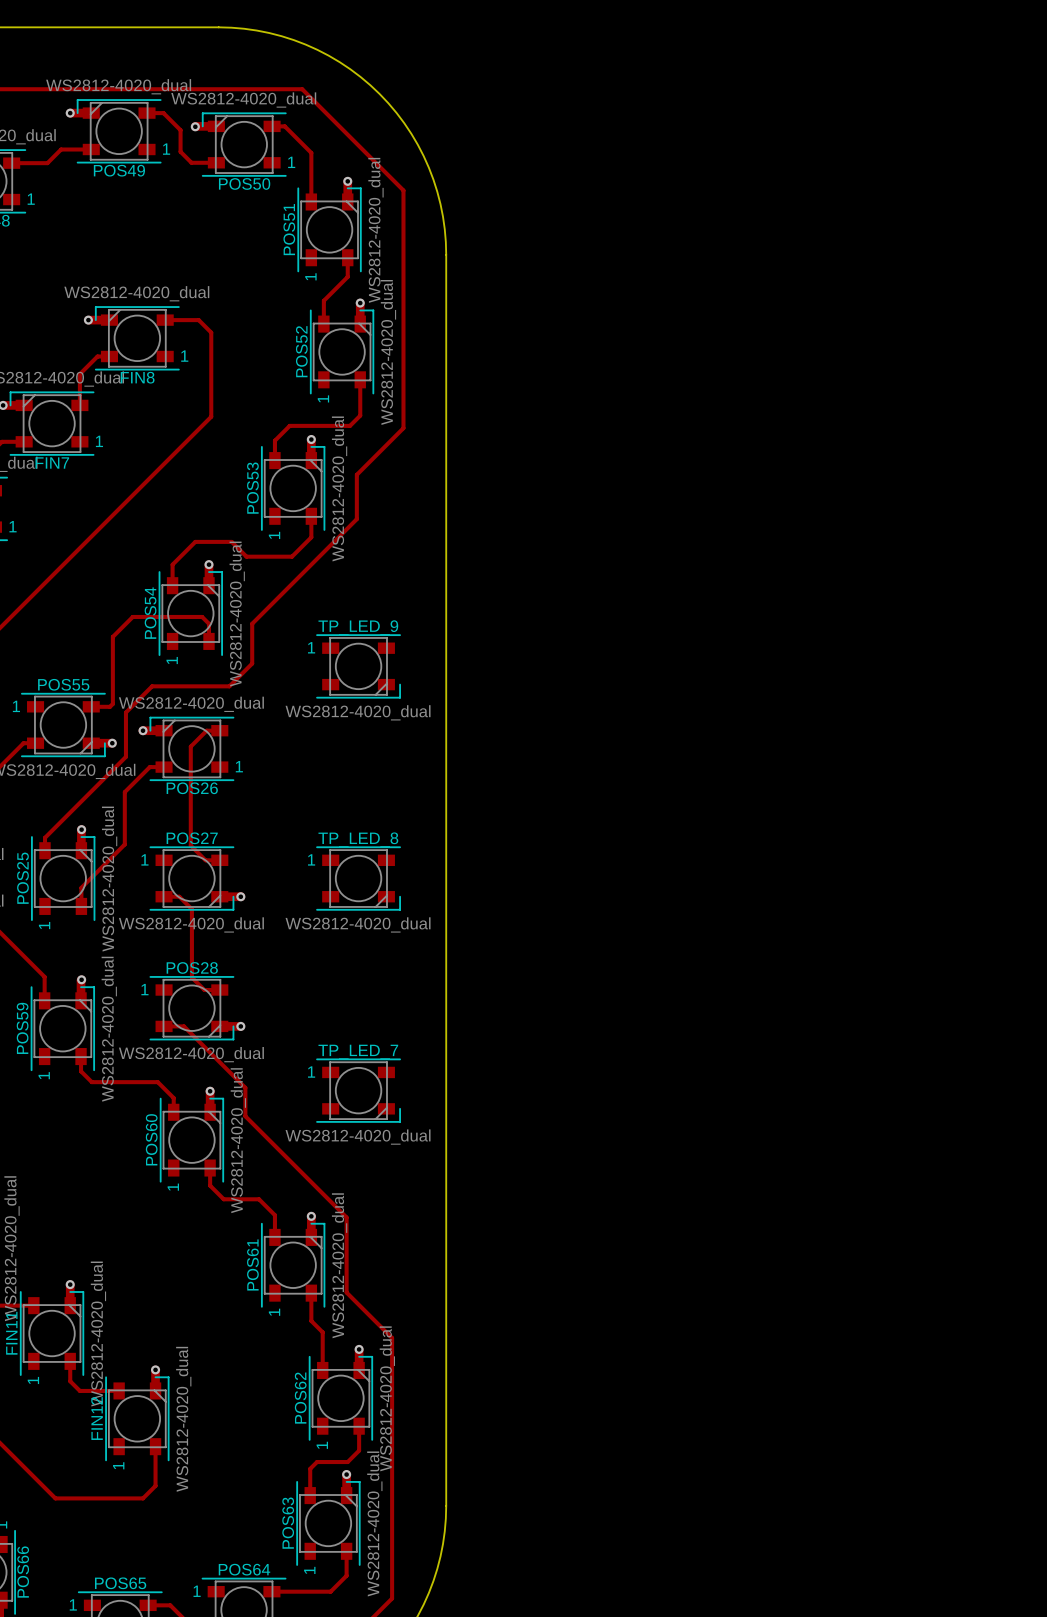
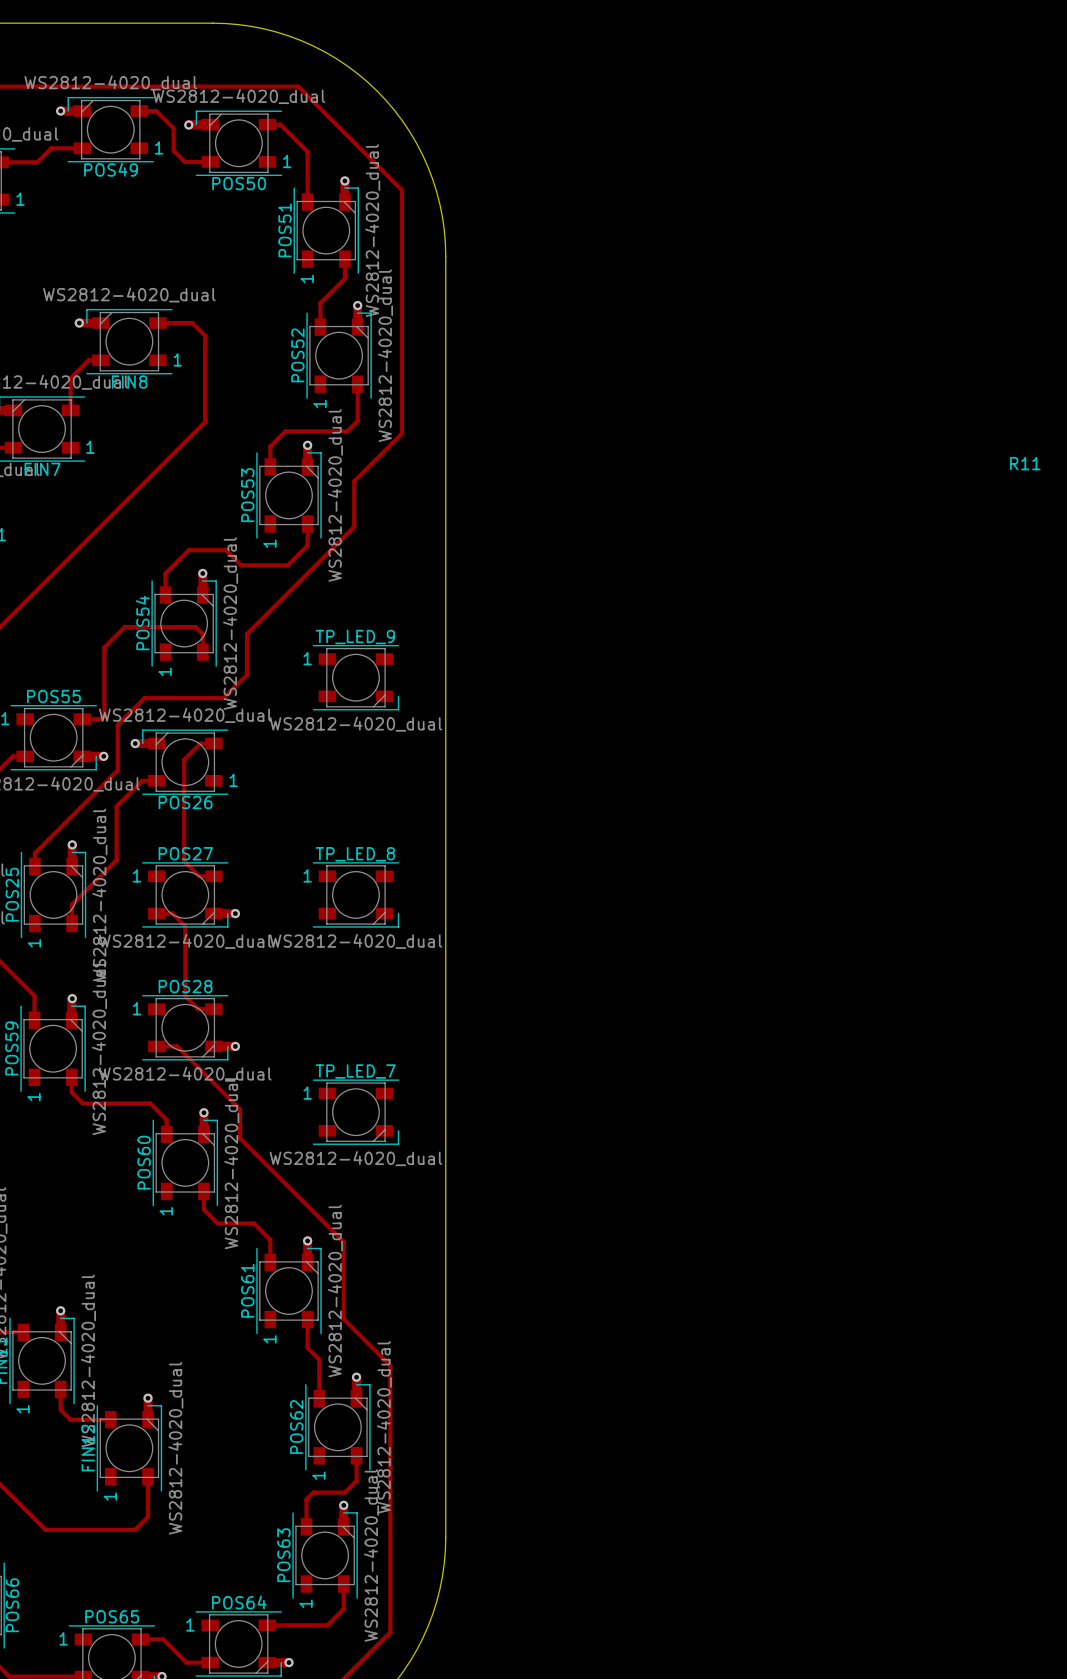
R11: none -> (1025, 463)

